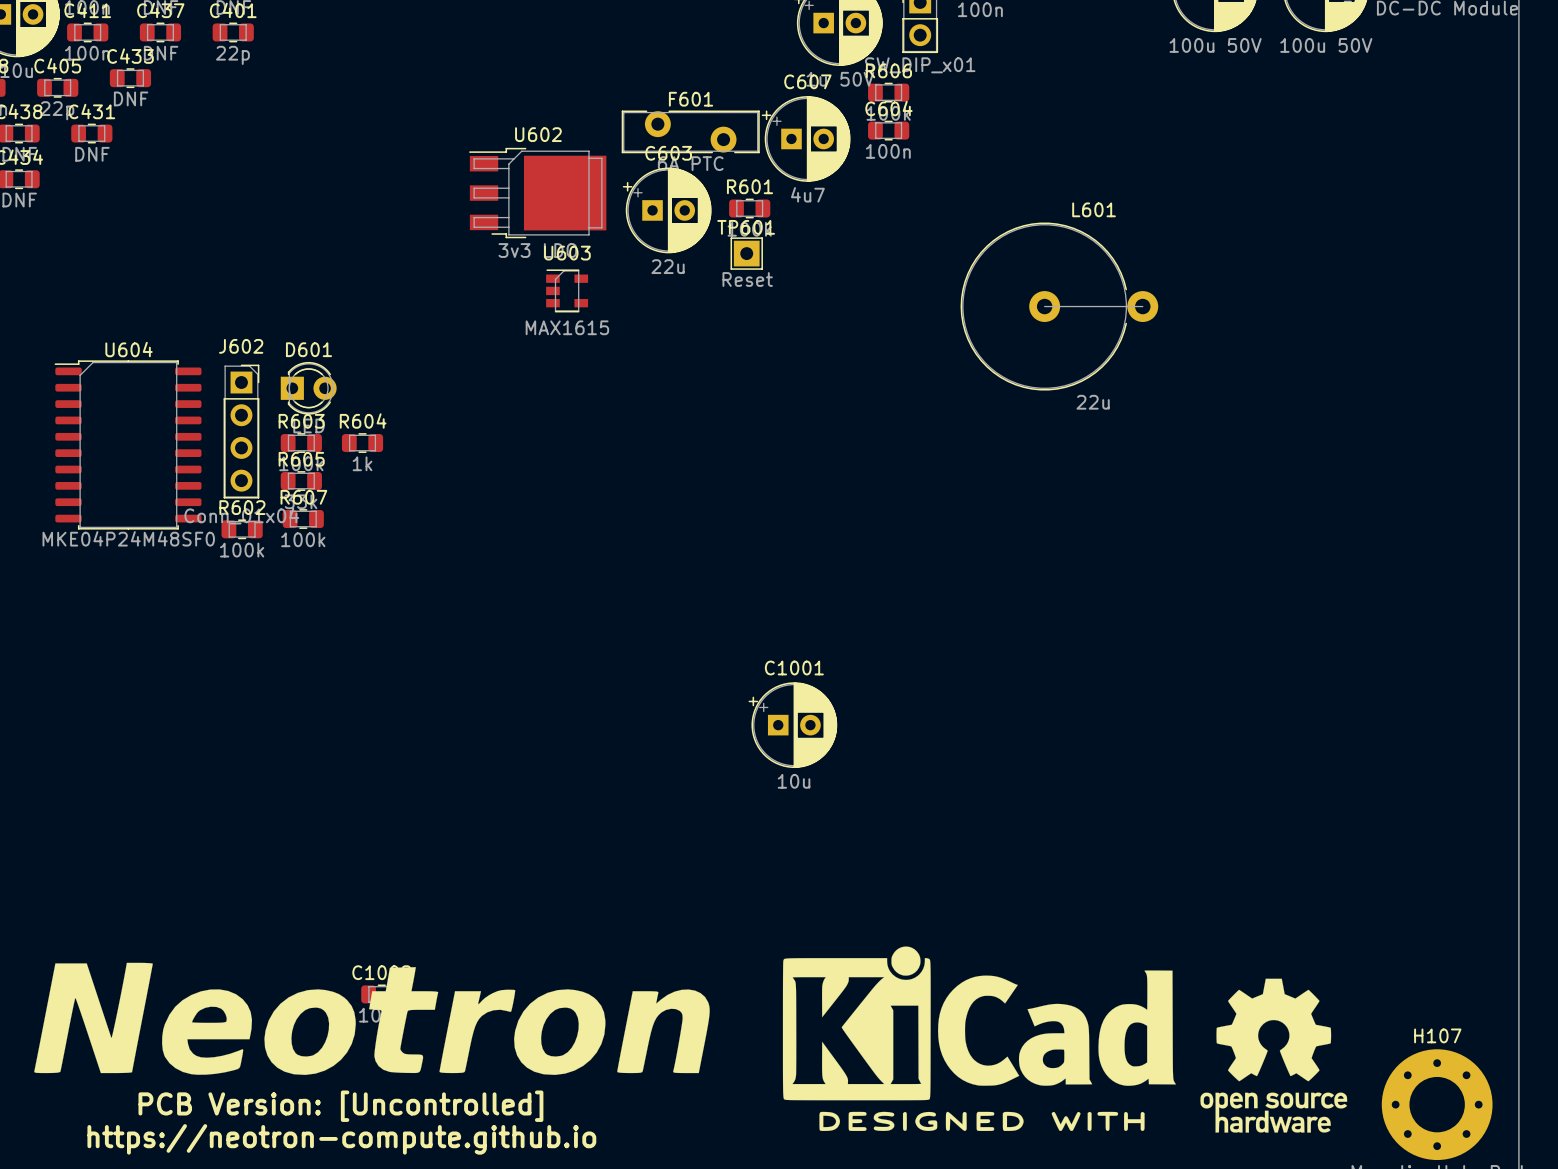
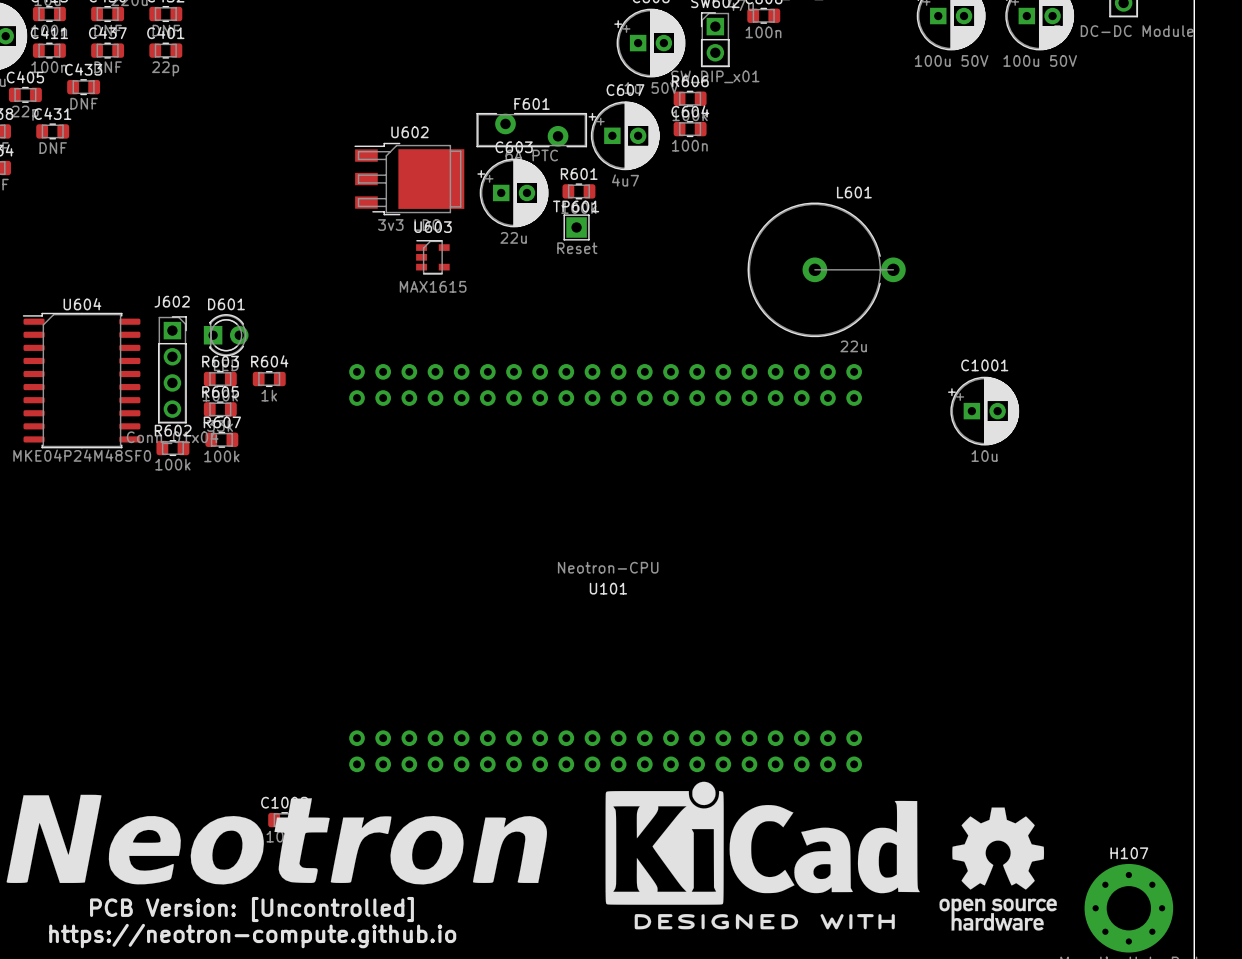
U101: none -> Neotron-CPU (605, 568)
C1001 position: (792, 725) -> (983, 411)

